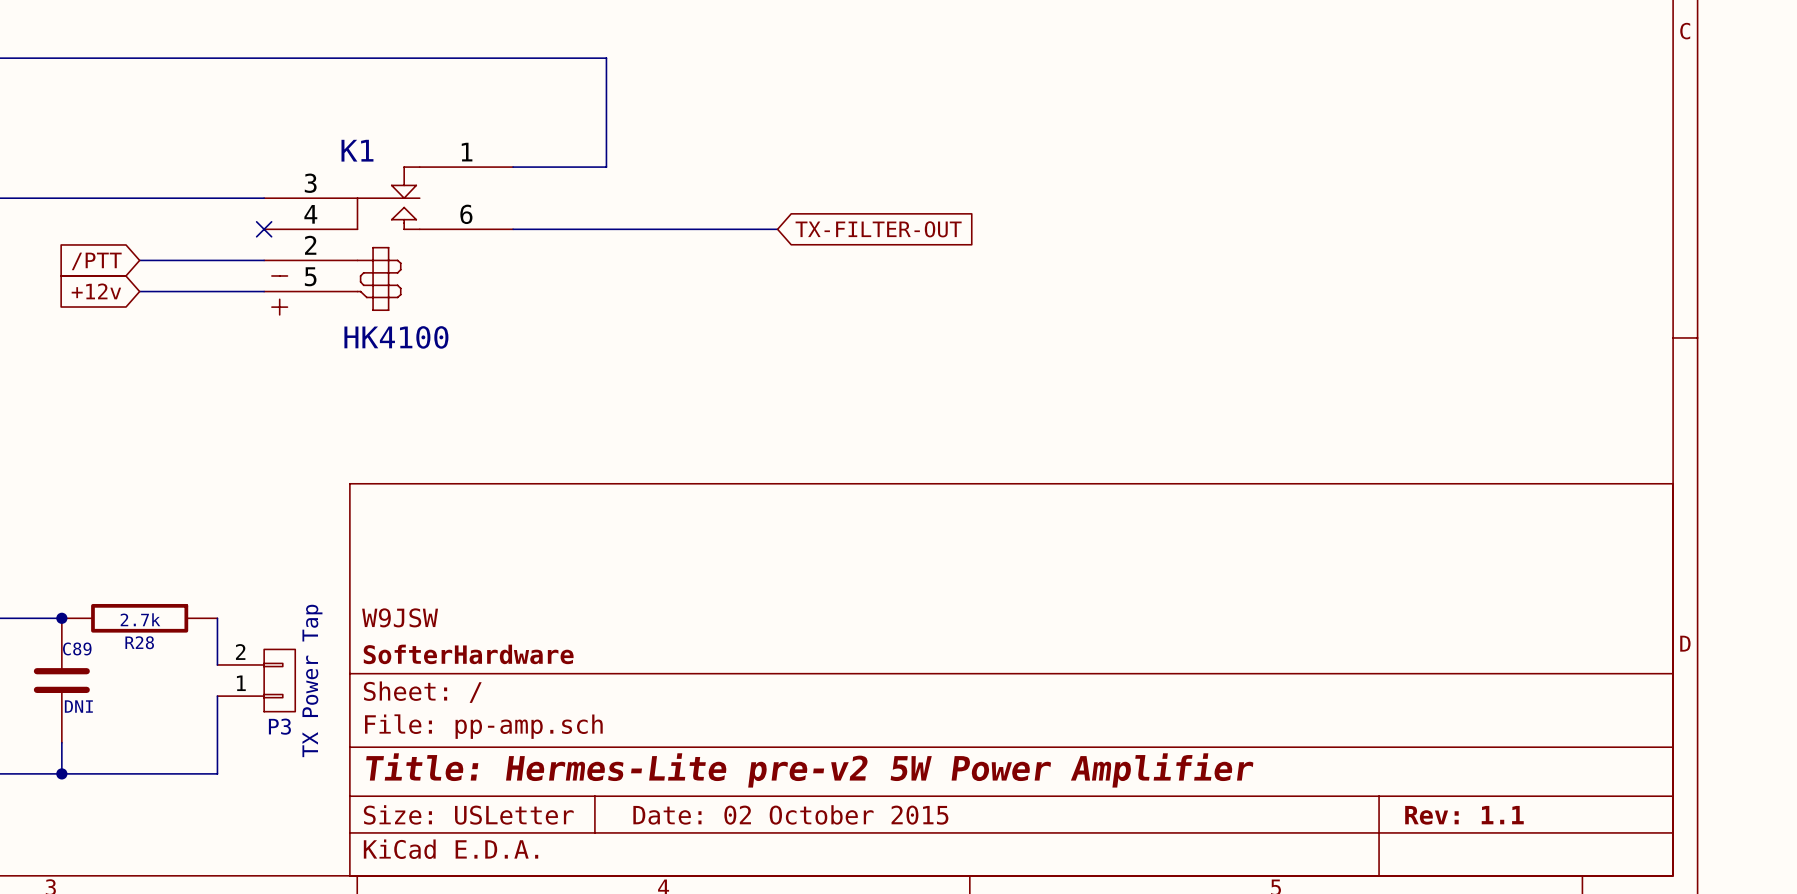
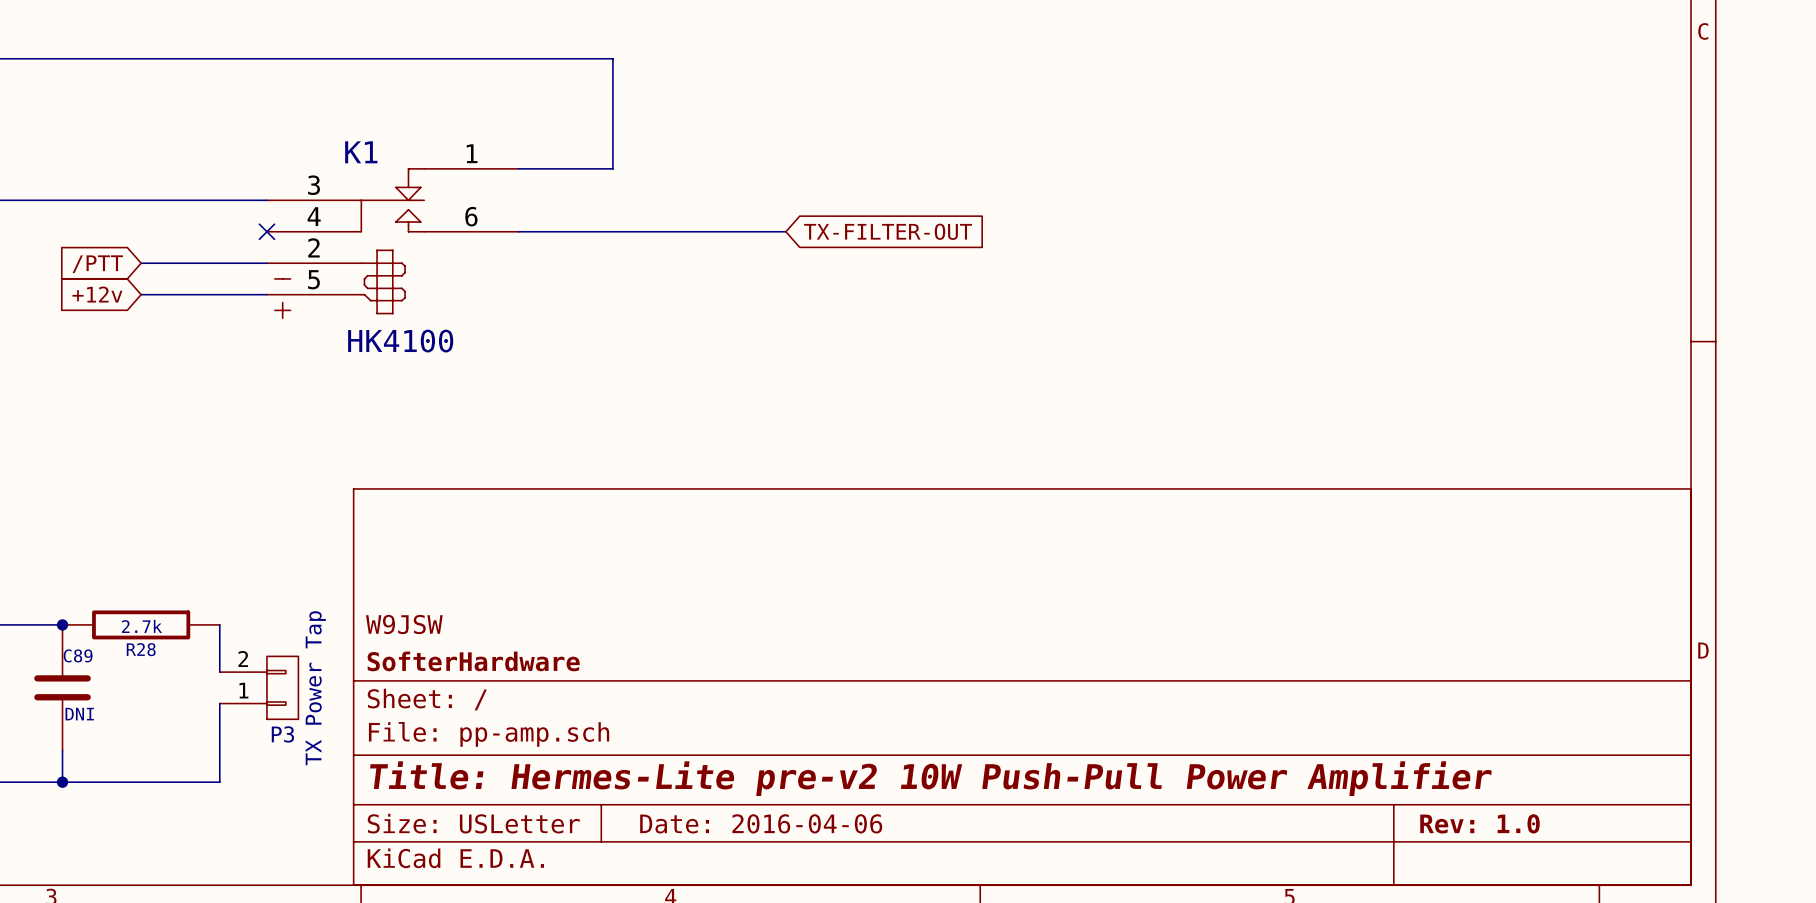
title block: Title: Hermes-Lite pre-v2 5W Power Amplifier (809, 770) -> Title: Hermes-Lite pre-v2 10W Push-Pull Power Amplifier (930, 778)
title block: Date: 02 October 2015 (790, 814) -> Date: 2016-04-06 (761, 823)
title block: Rev: 1.1 (1464, 815) -> Rev: 1.0 (1480, 823)

